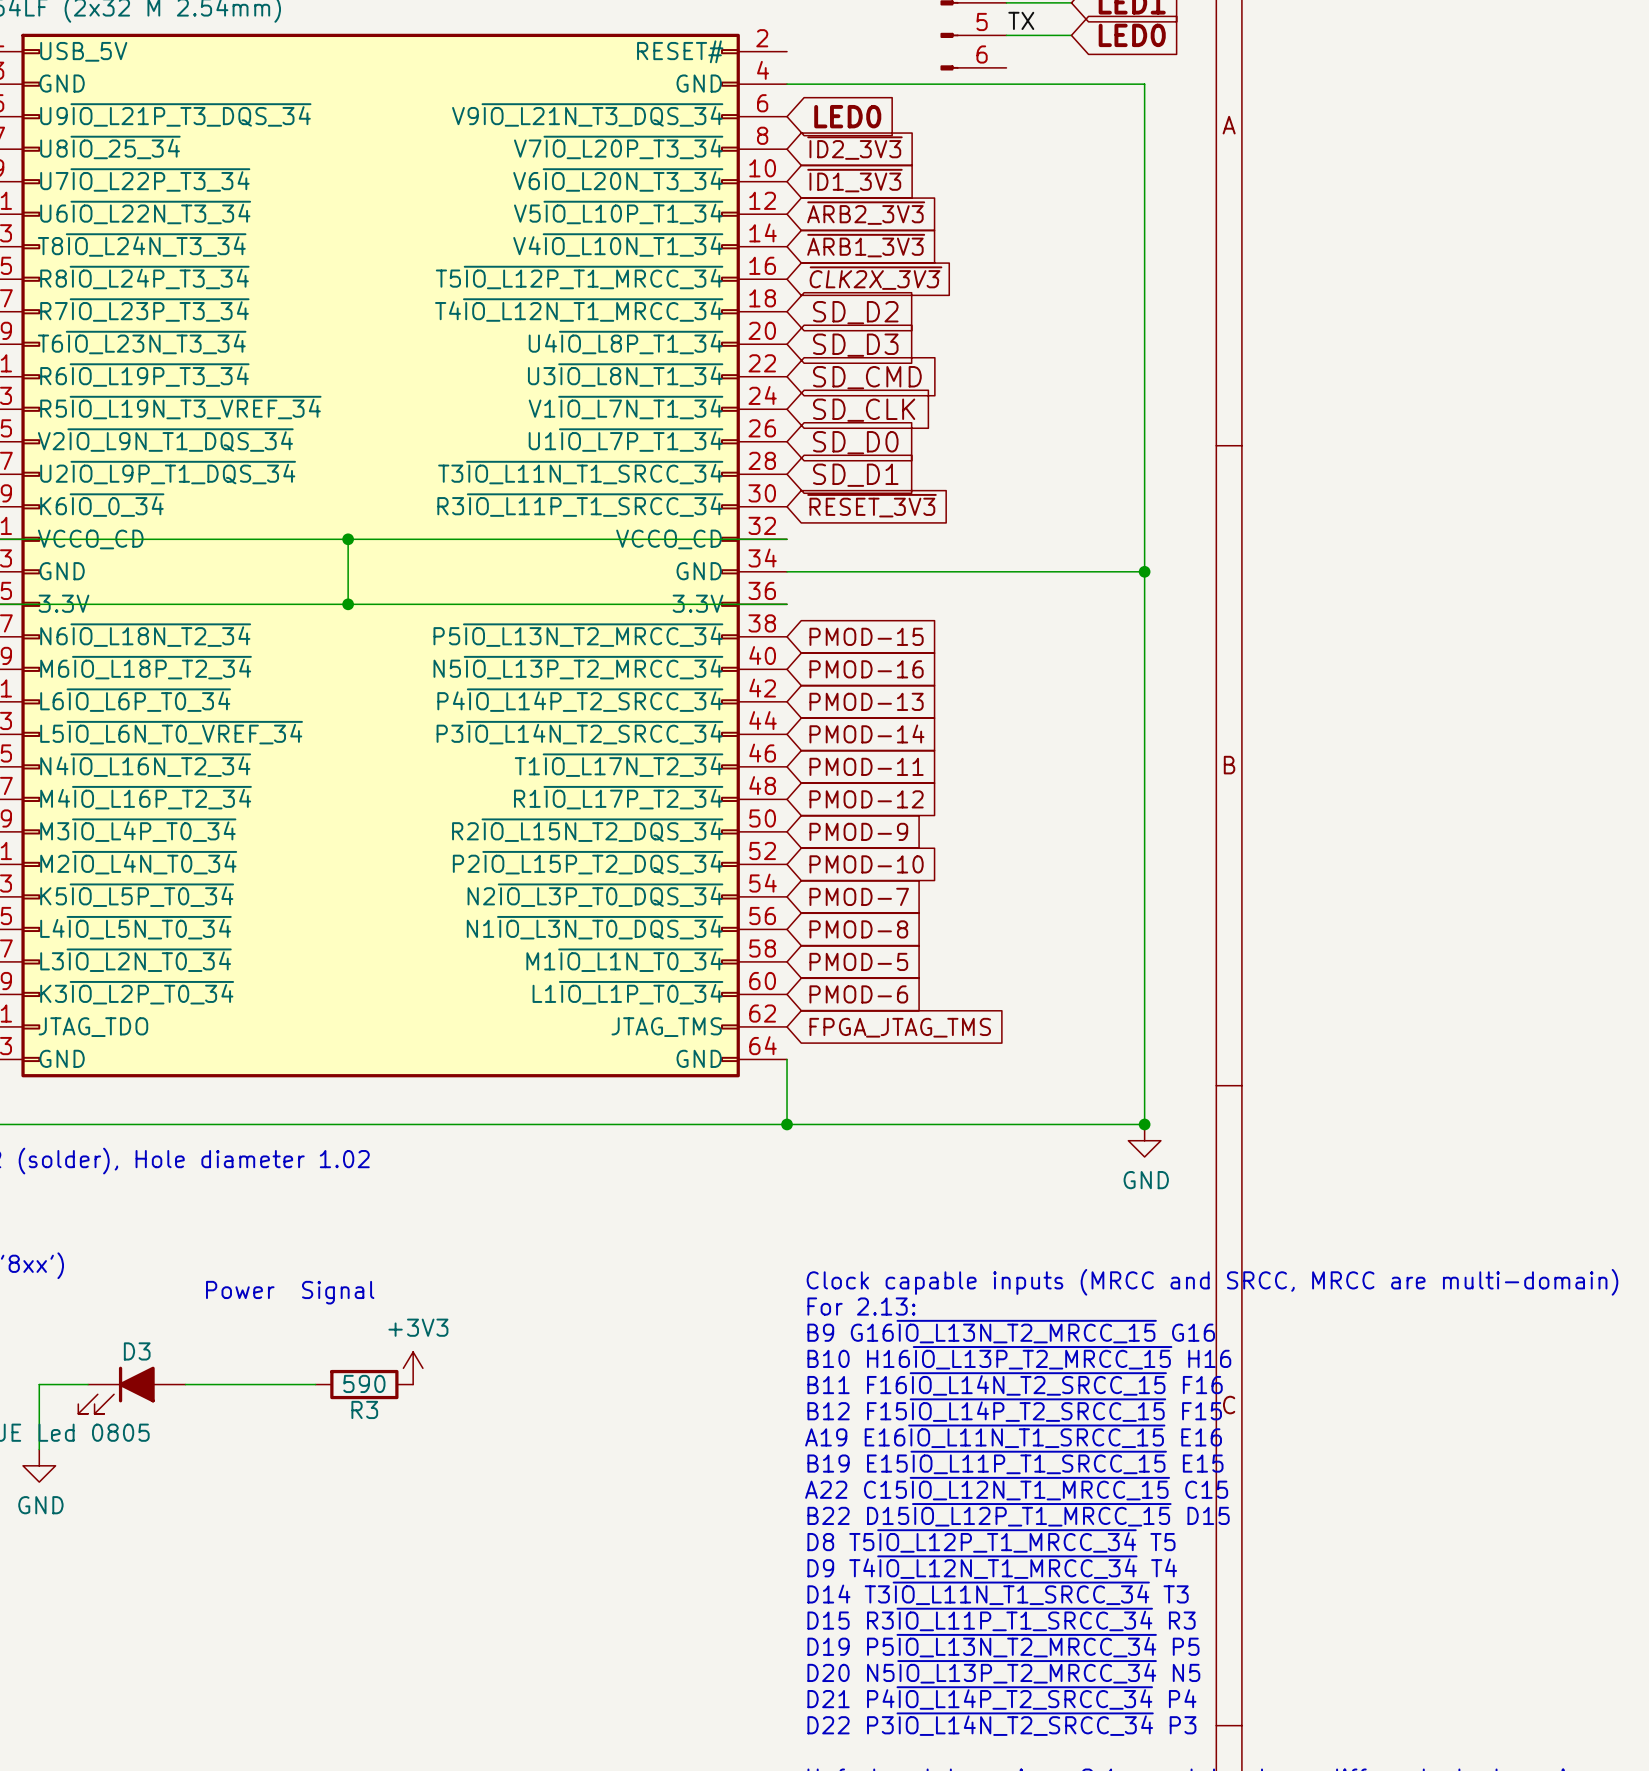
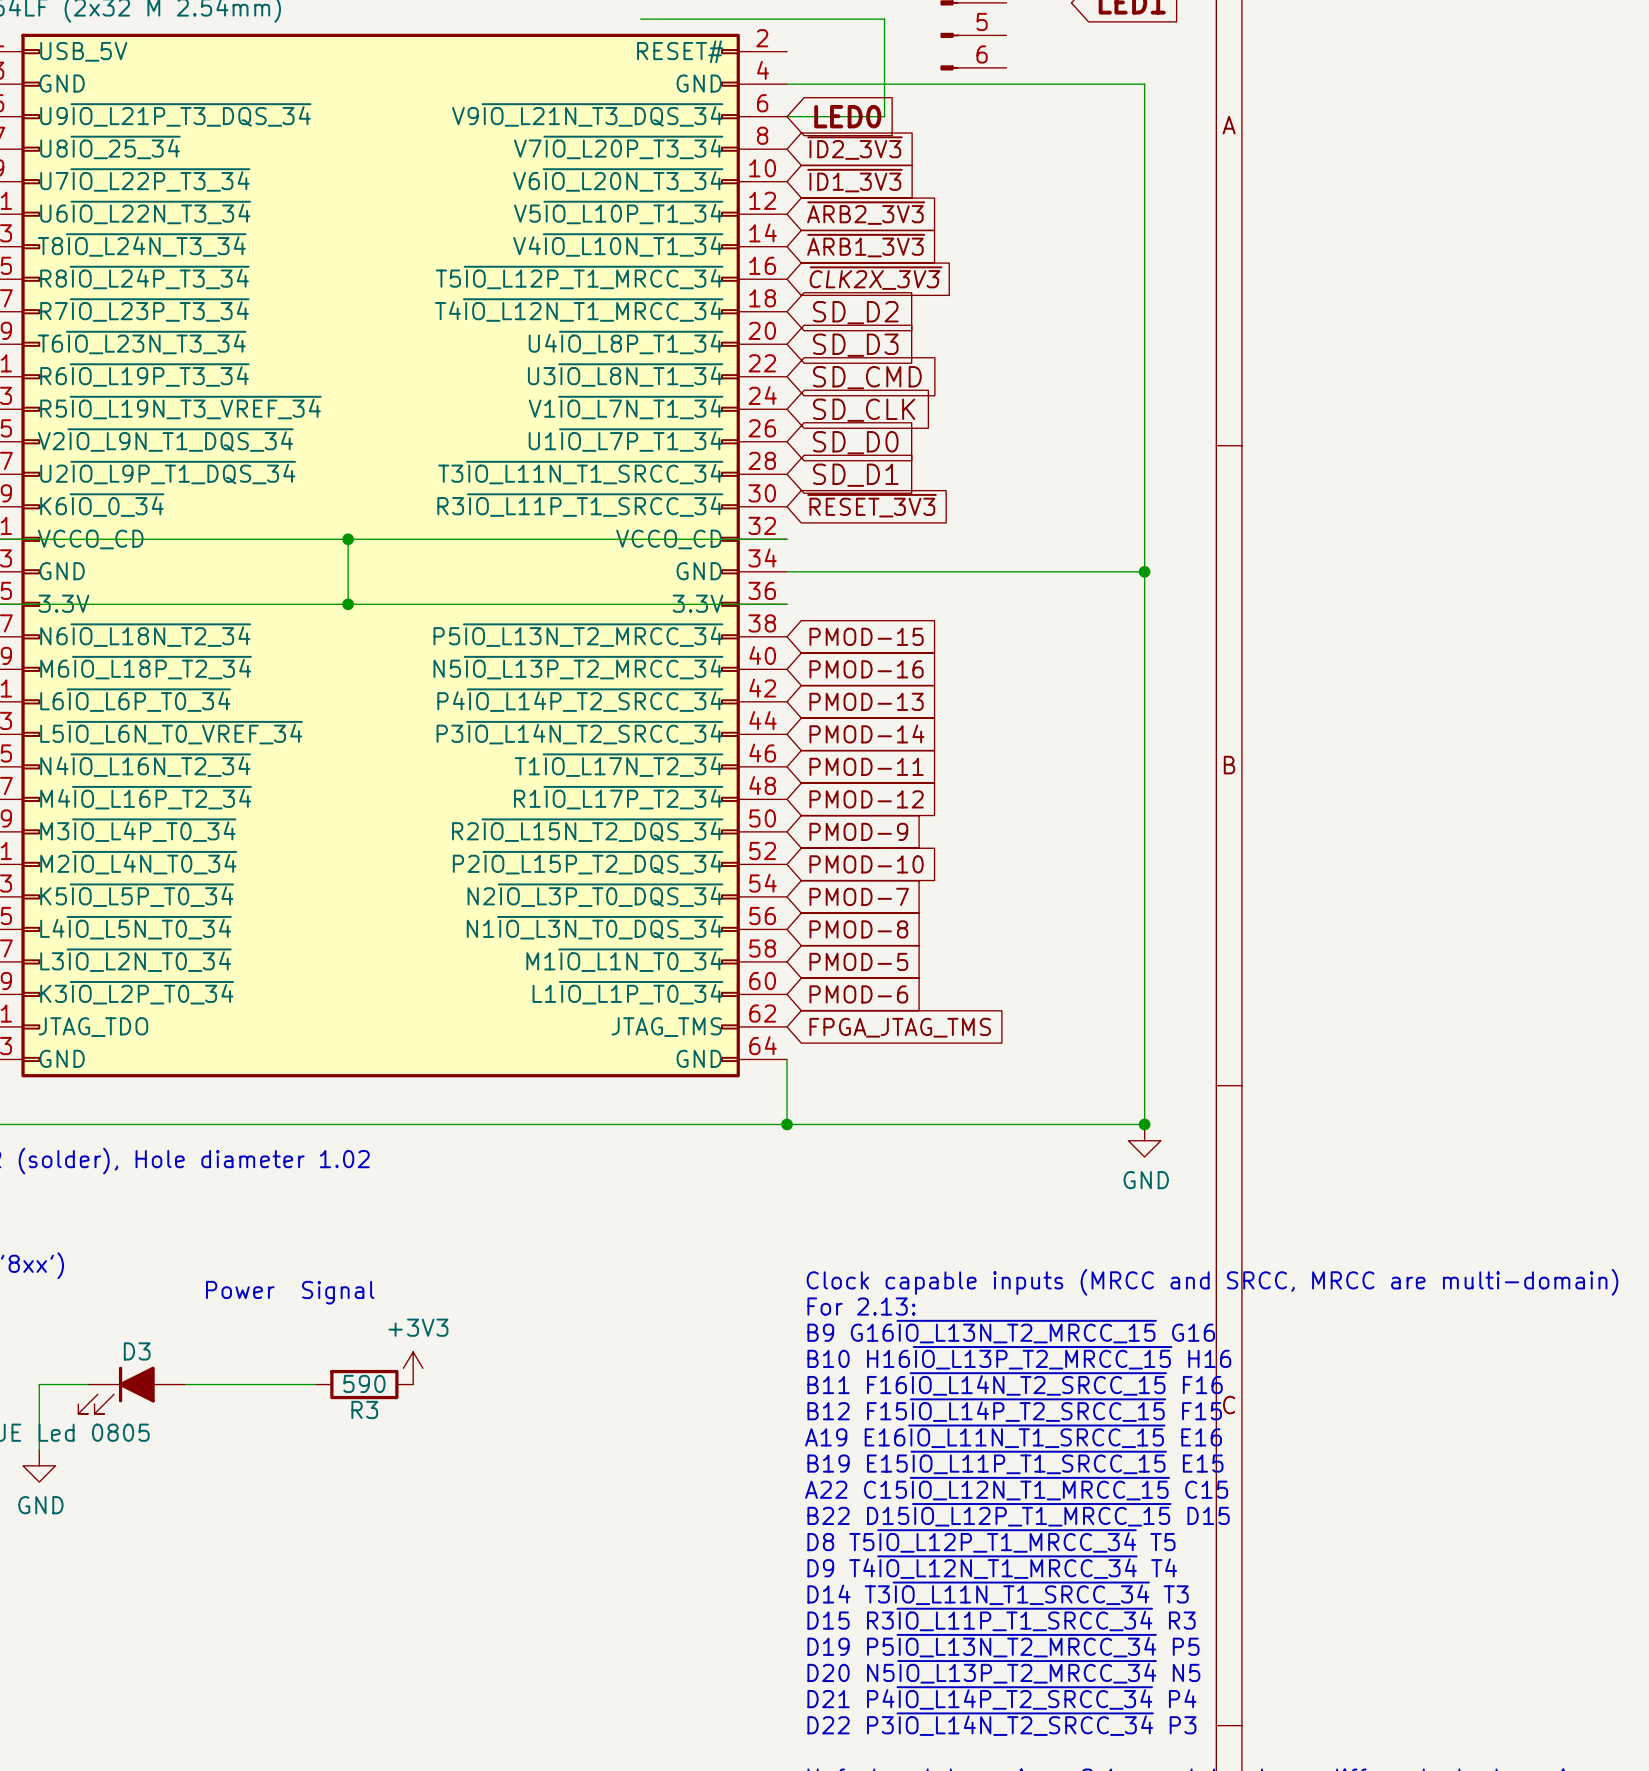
wire: (1006, 2) (1071, 2) -> none
wire: none -> (640, 19) (884, 19) (884, 116) (787, 116)
label: TX (1021, 20) -> none
wire: (1006, 35) (1071, 35) -> none
global label: LED0 (1132, 35) -> none

